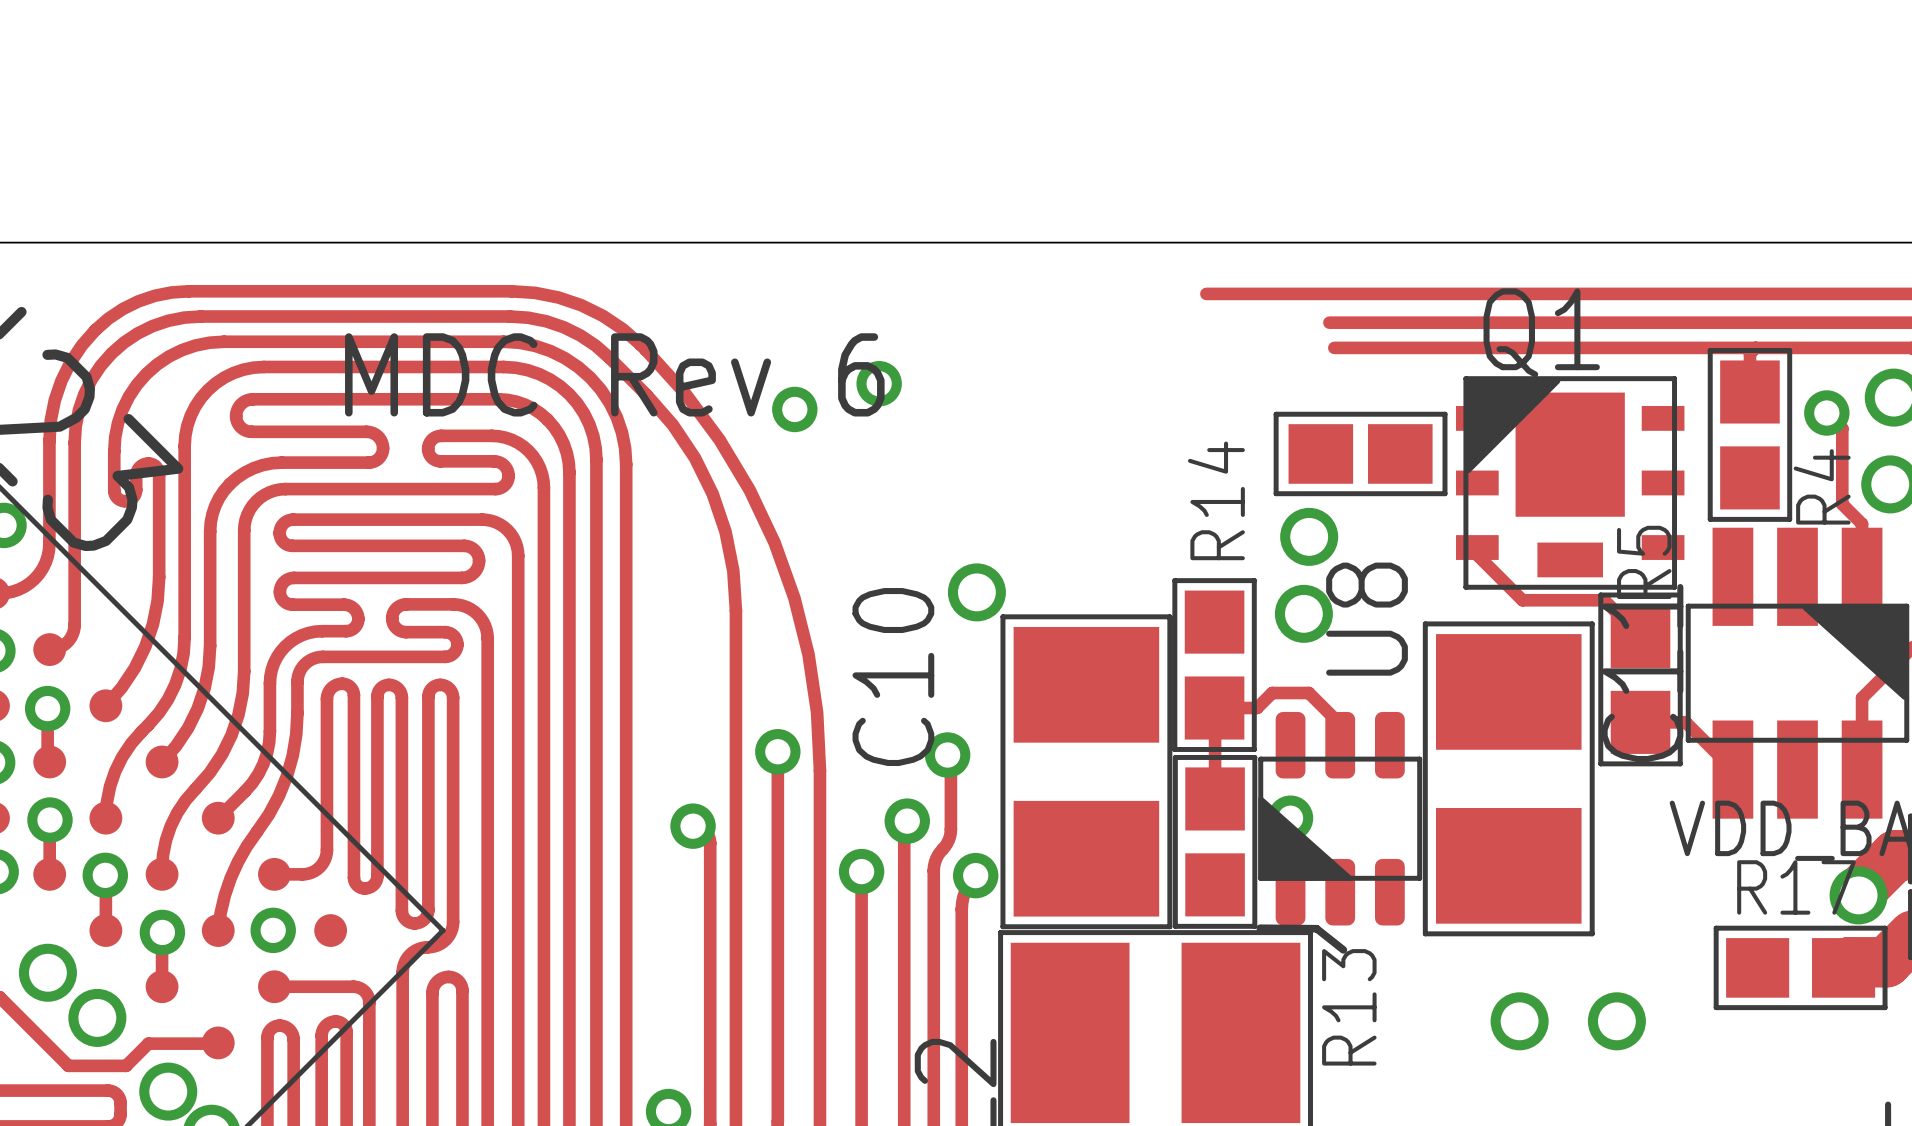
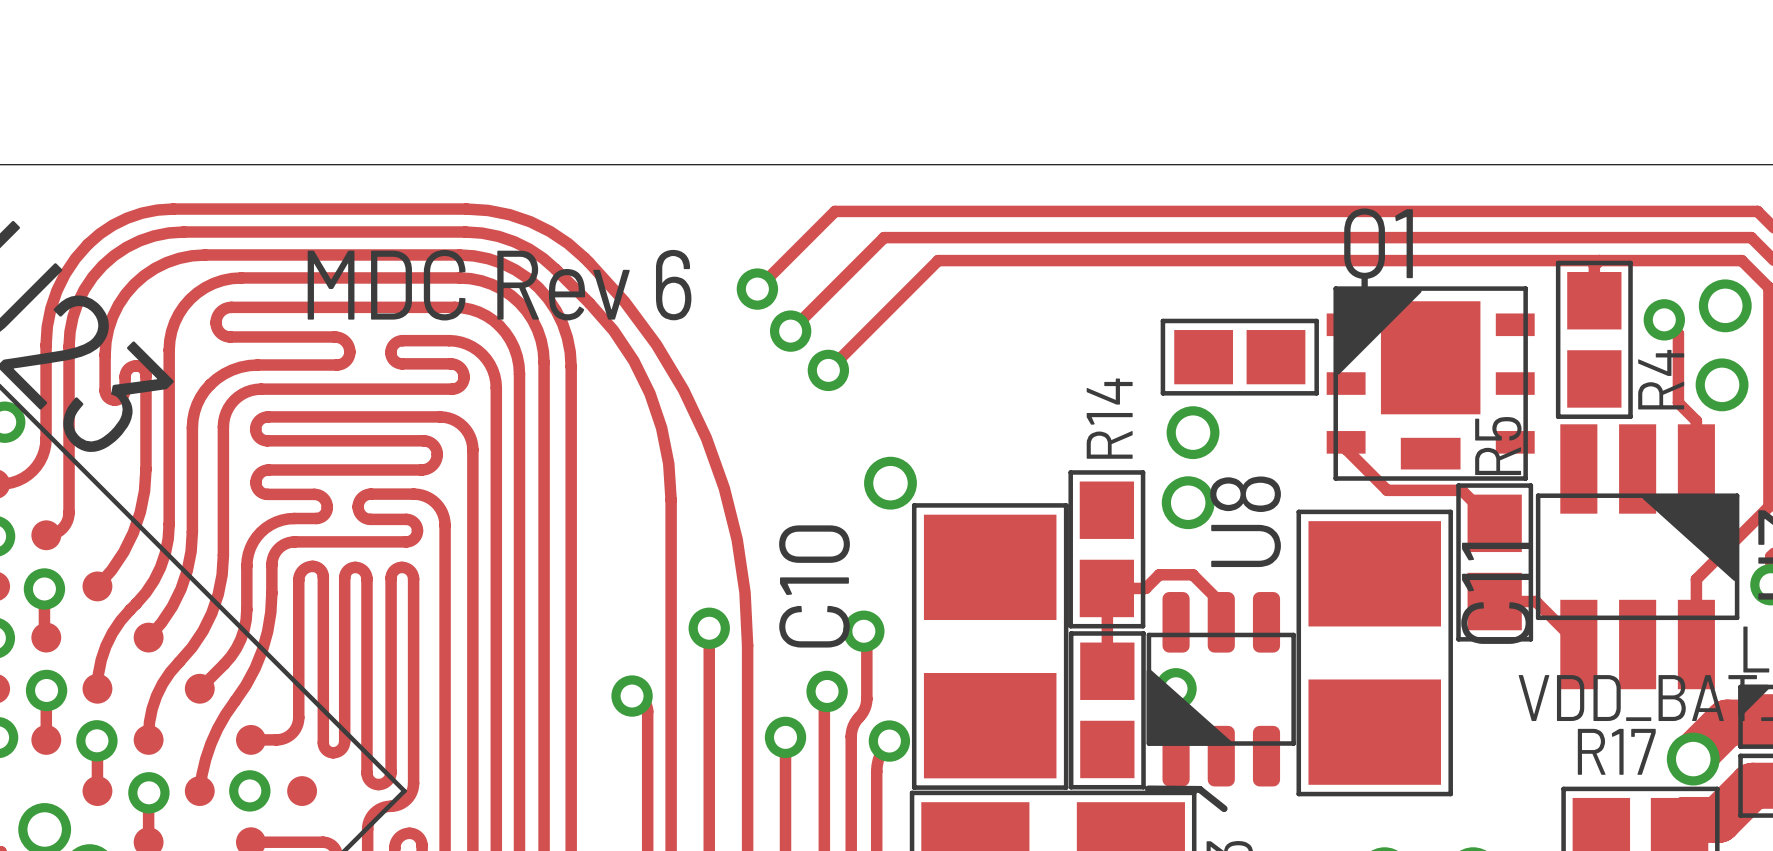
track: none -> (1099, 211) (835, 211) (757, 289)
track: none -> (1211, 237) (884, 237) (790, 331)
track: none -> (1215, 260) (938, 260) (828, 370)
via position: (879, 383) -> (790, 331)
via position: (794, 409) -> (757, 289)
via: none -> (828, 370)

